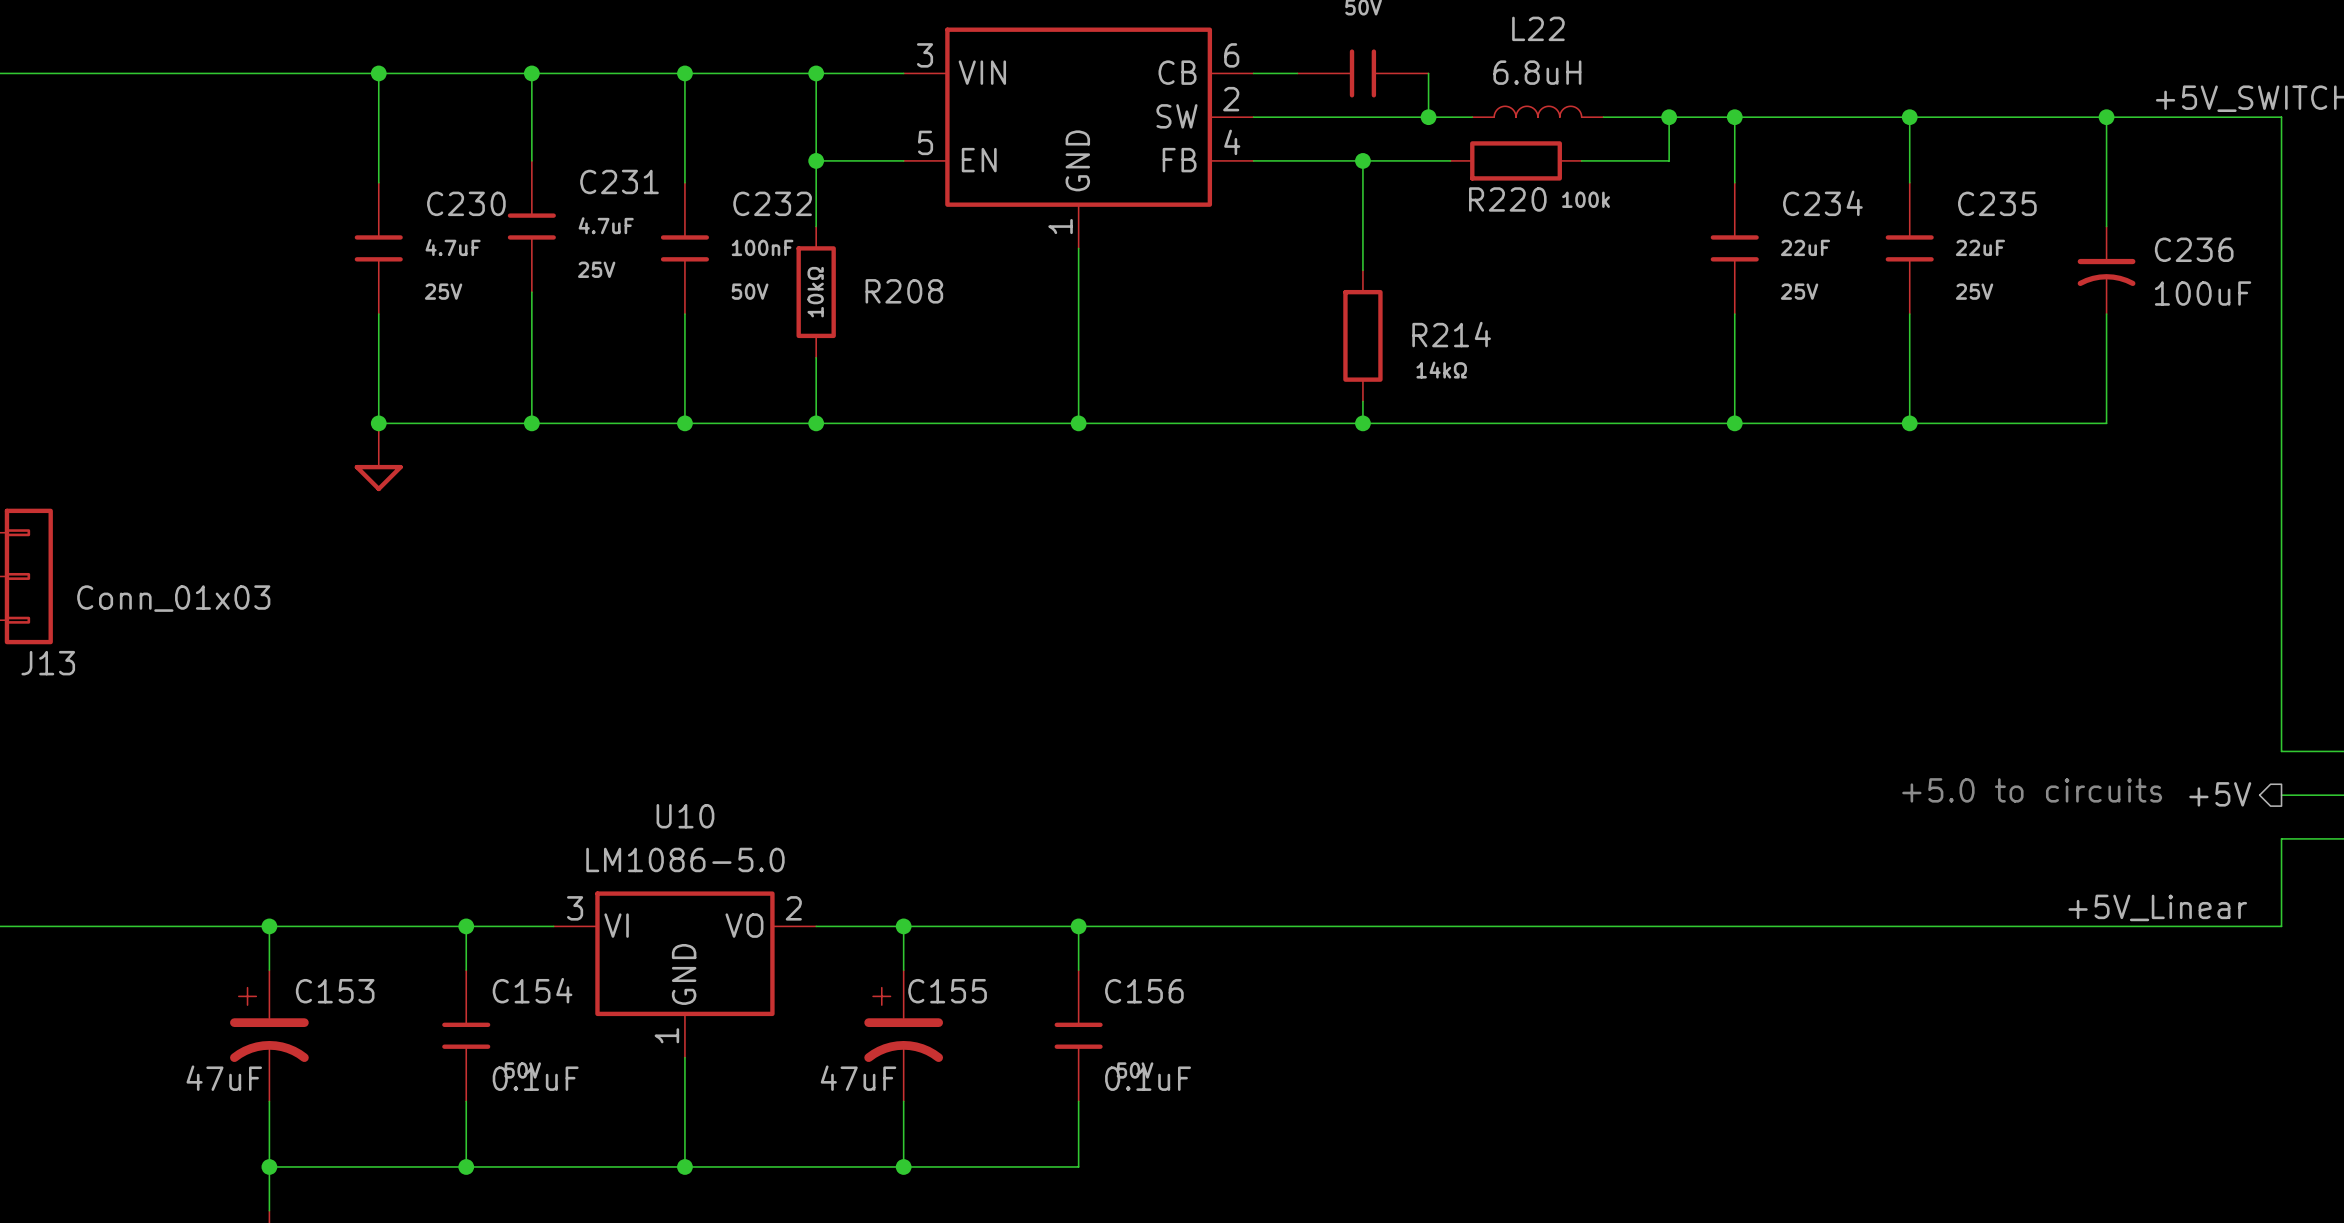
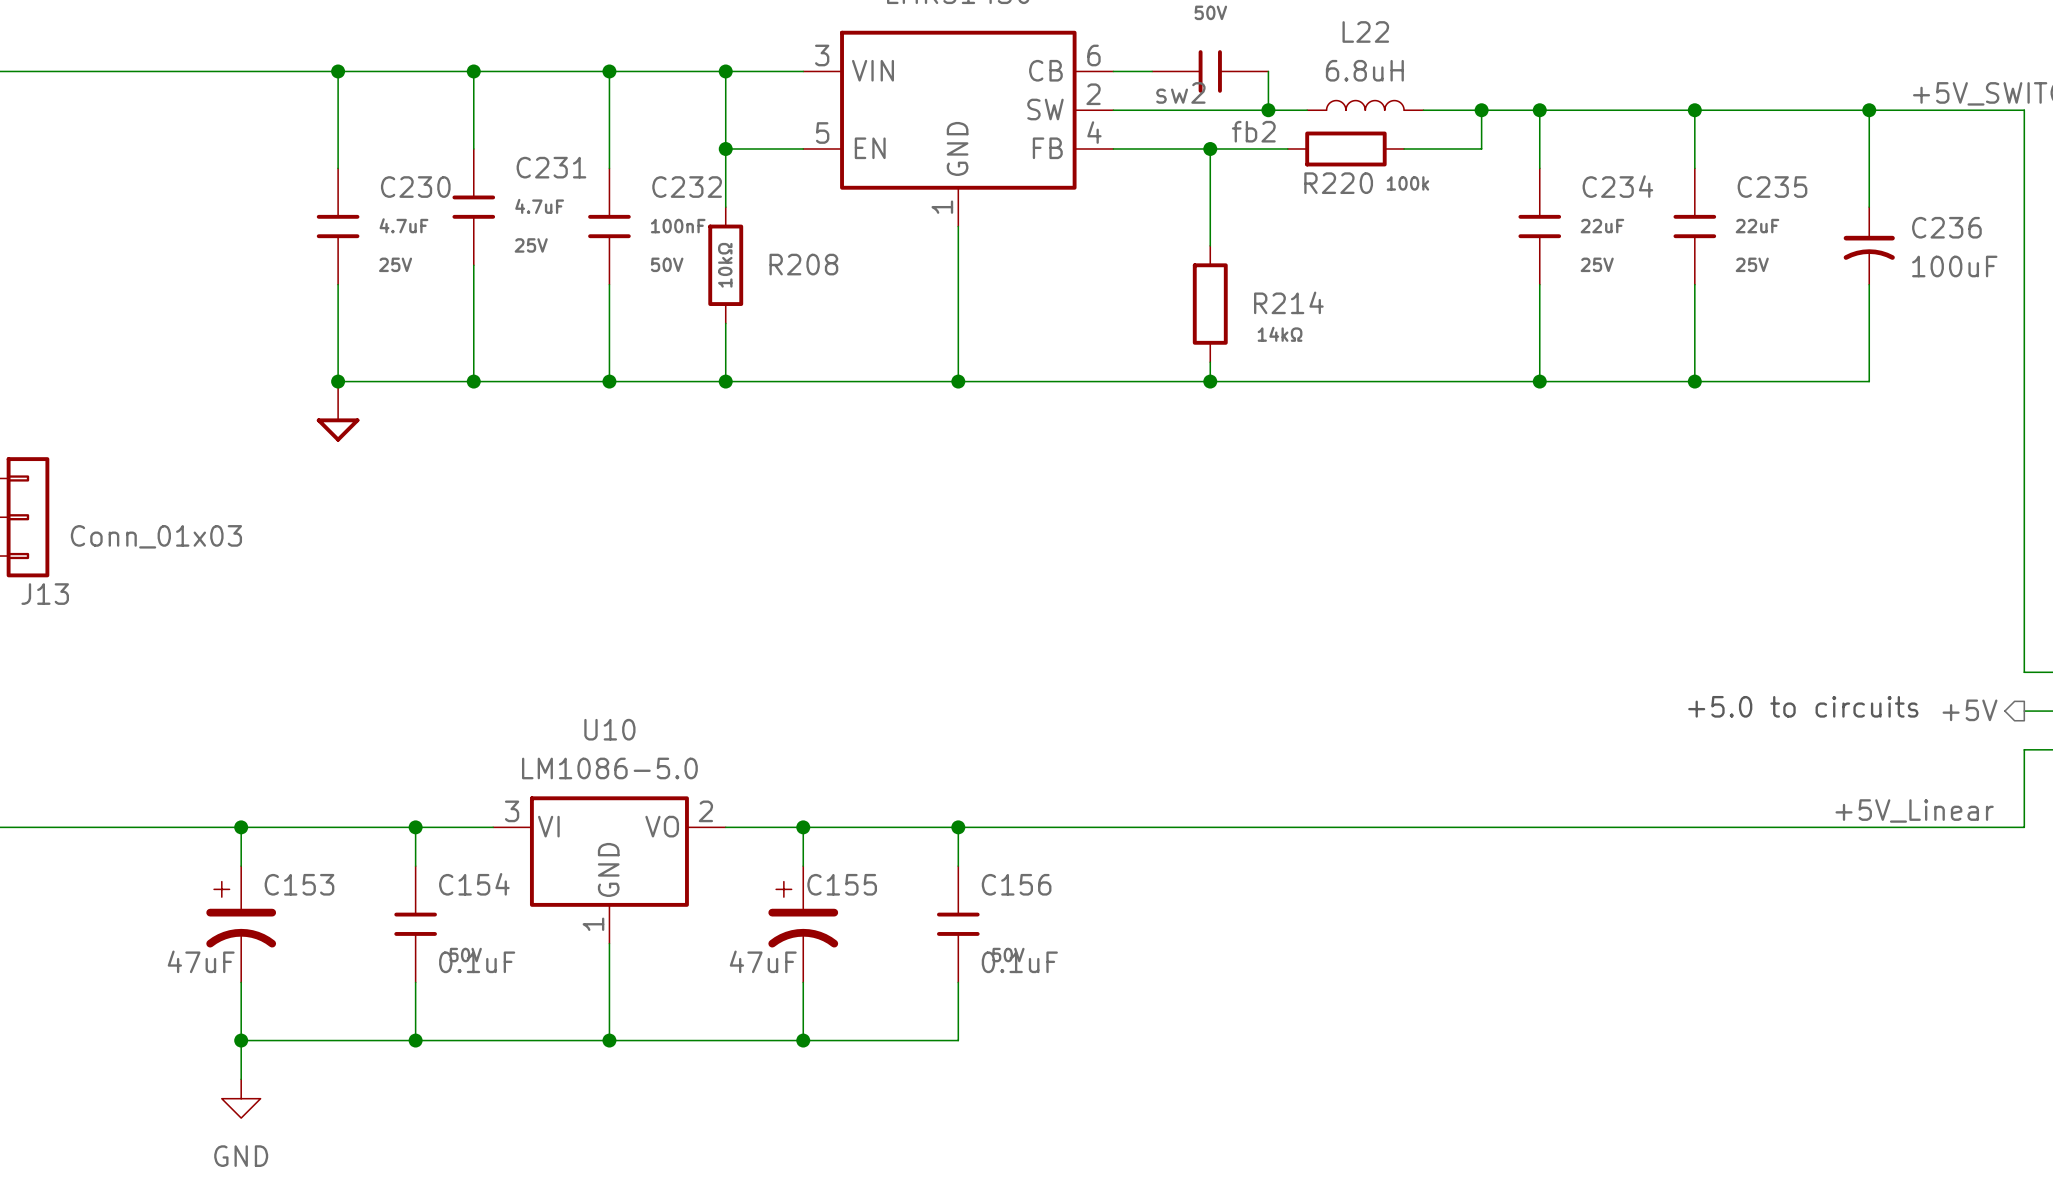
label: none -> sw2 (1180, 92)
label: none -> fb2 (1253, 131)

